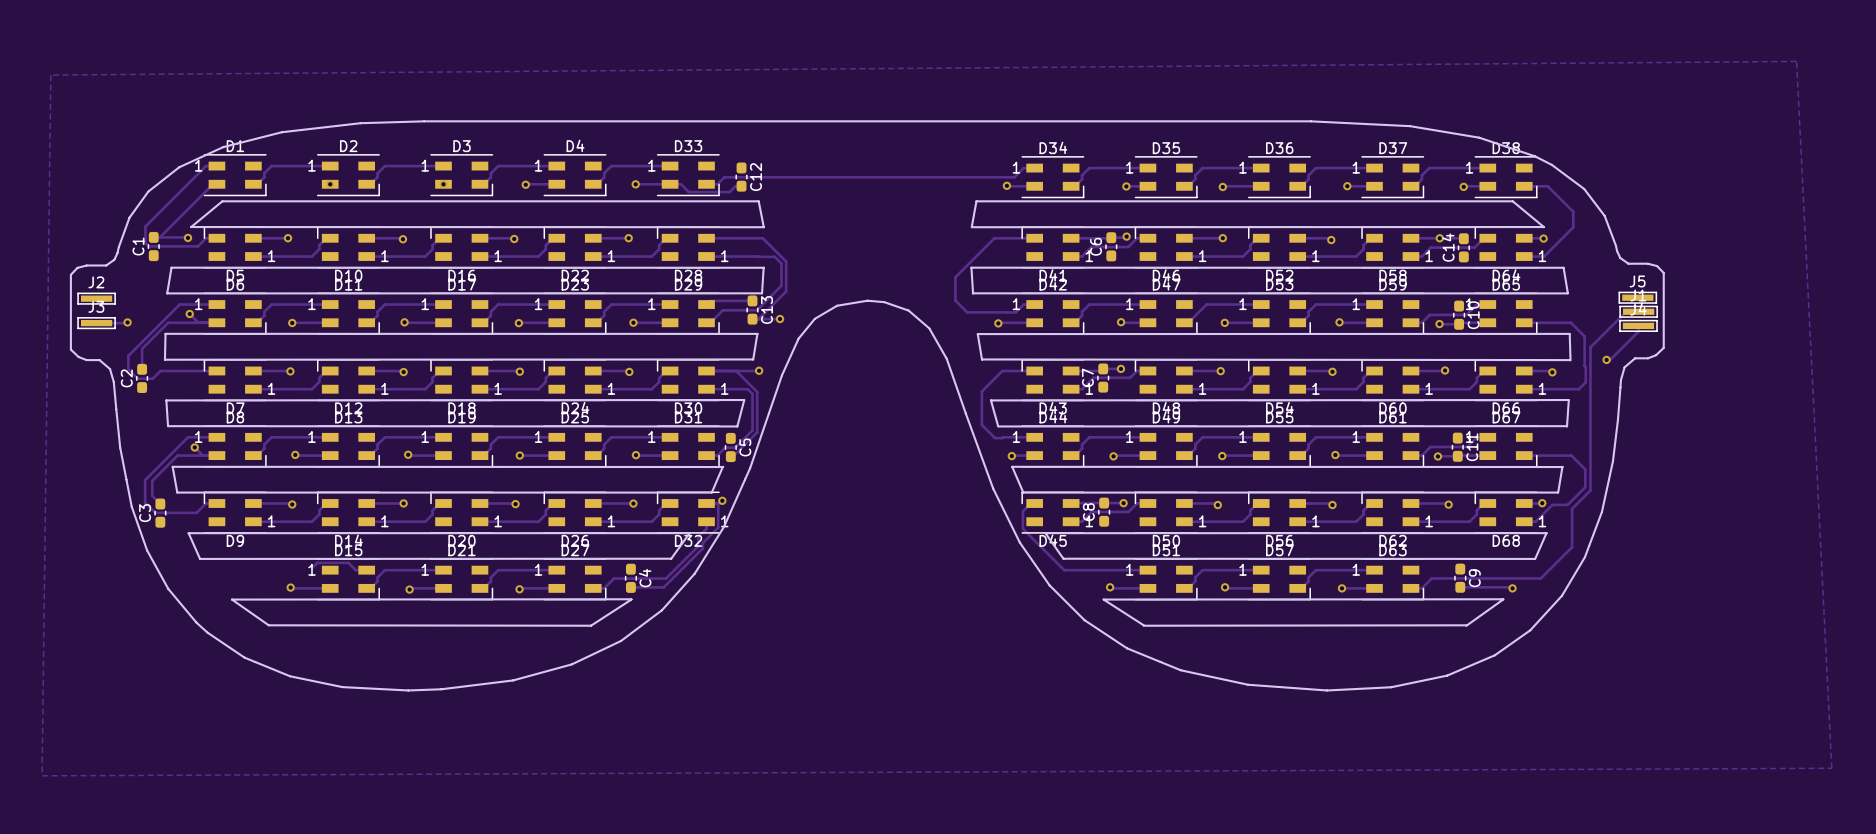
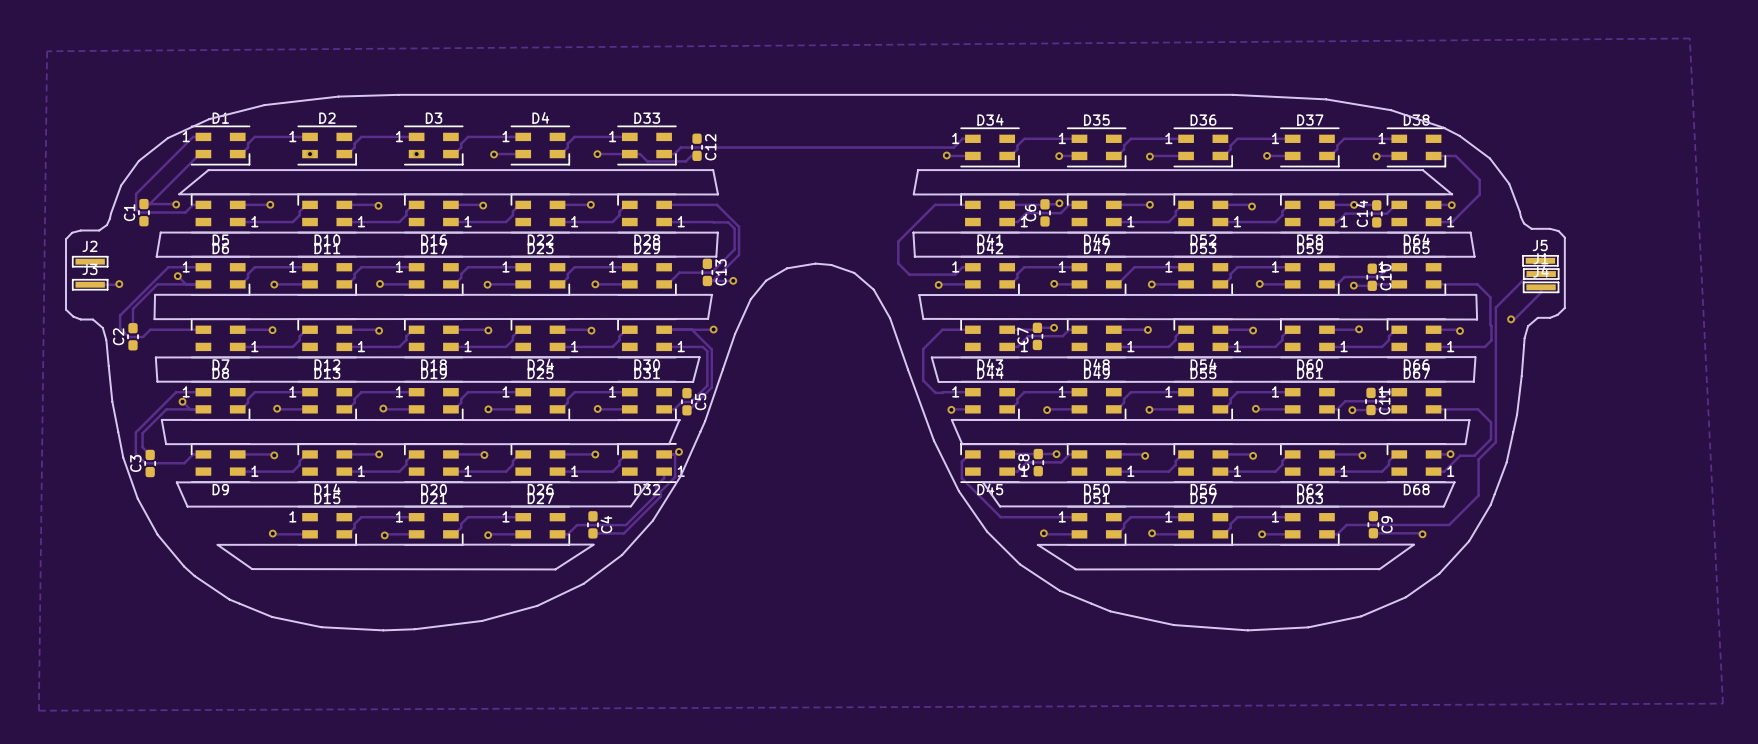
track: (752, 300) (710, 300) (706, 304) -> none
track: (312, 567) (317, 562) (348, 562) (355, 570) (366, 570) -> none

